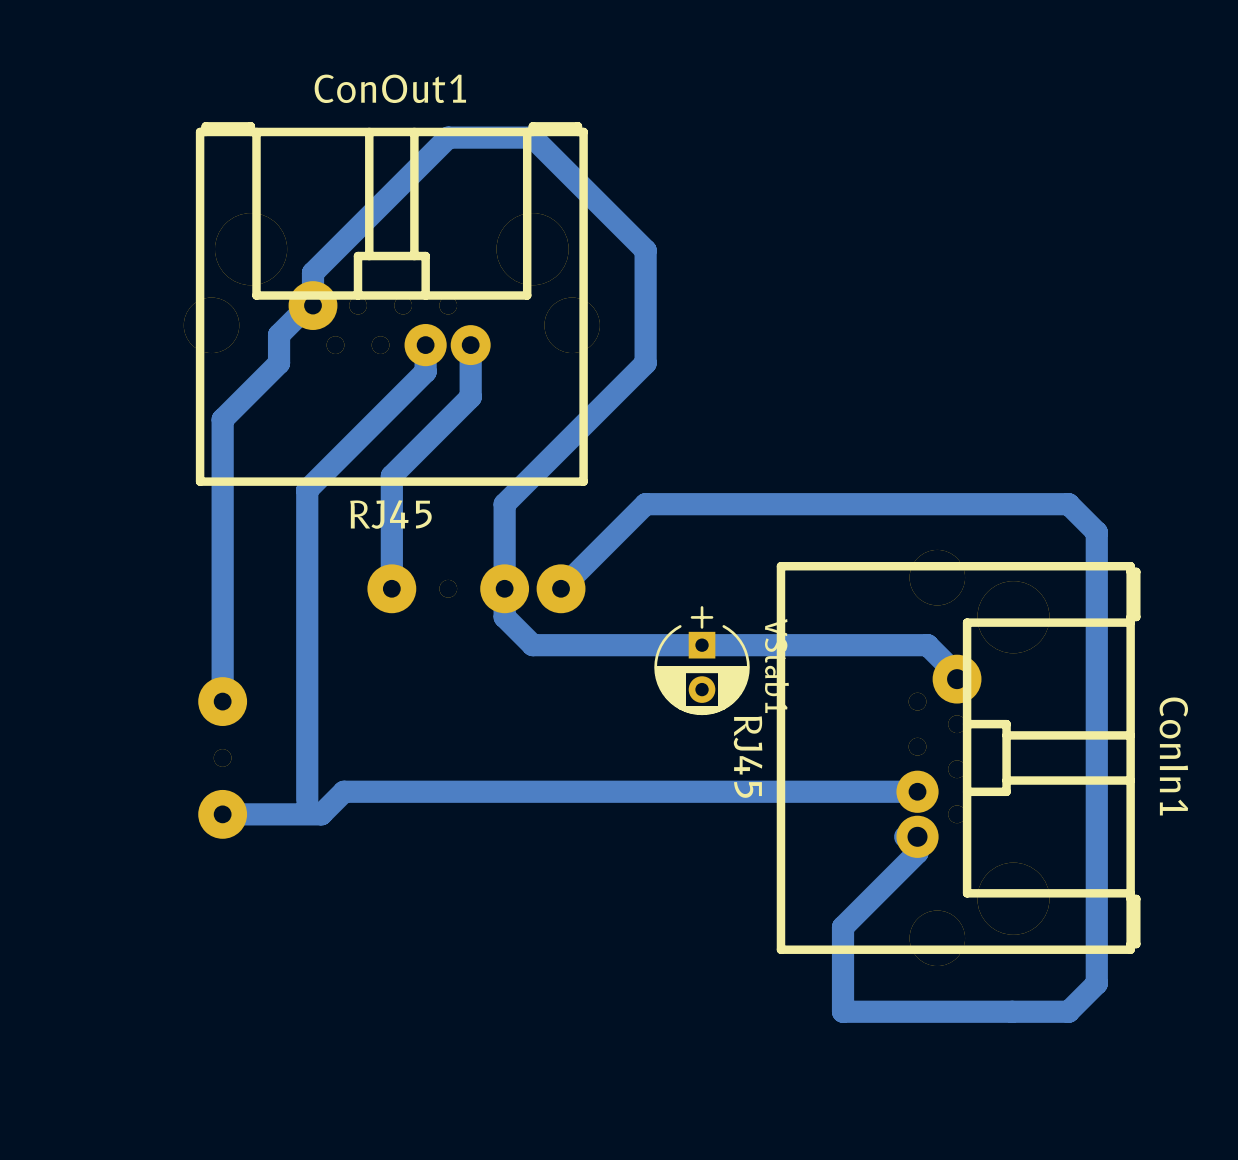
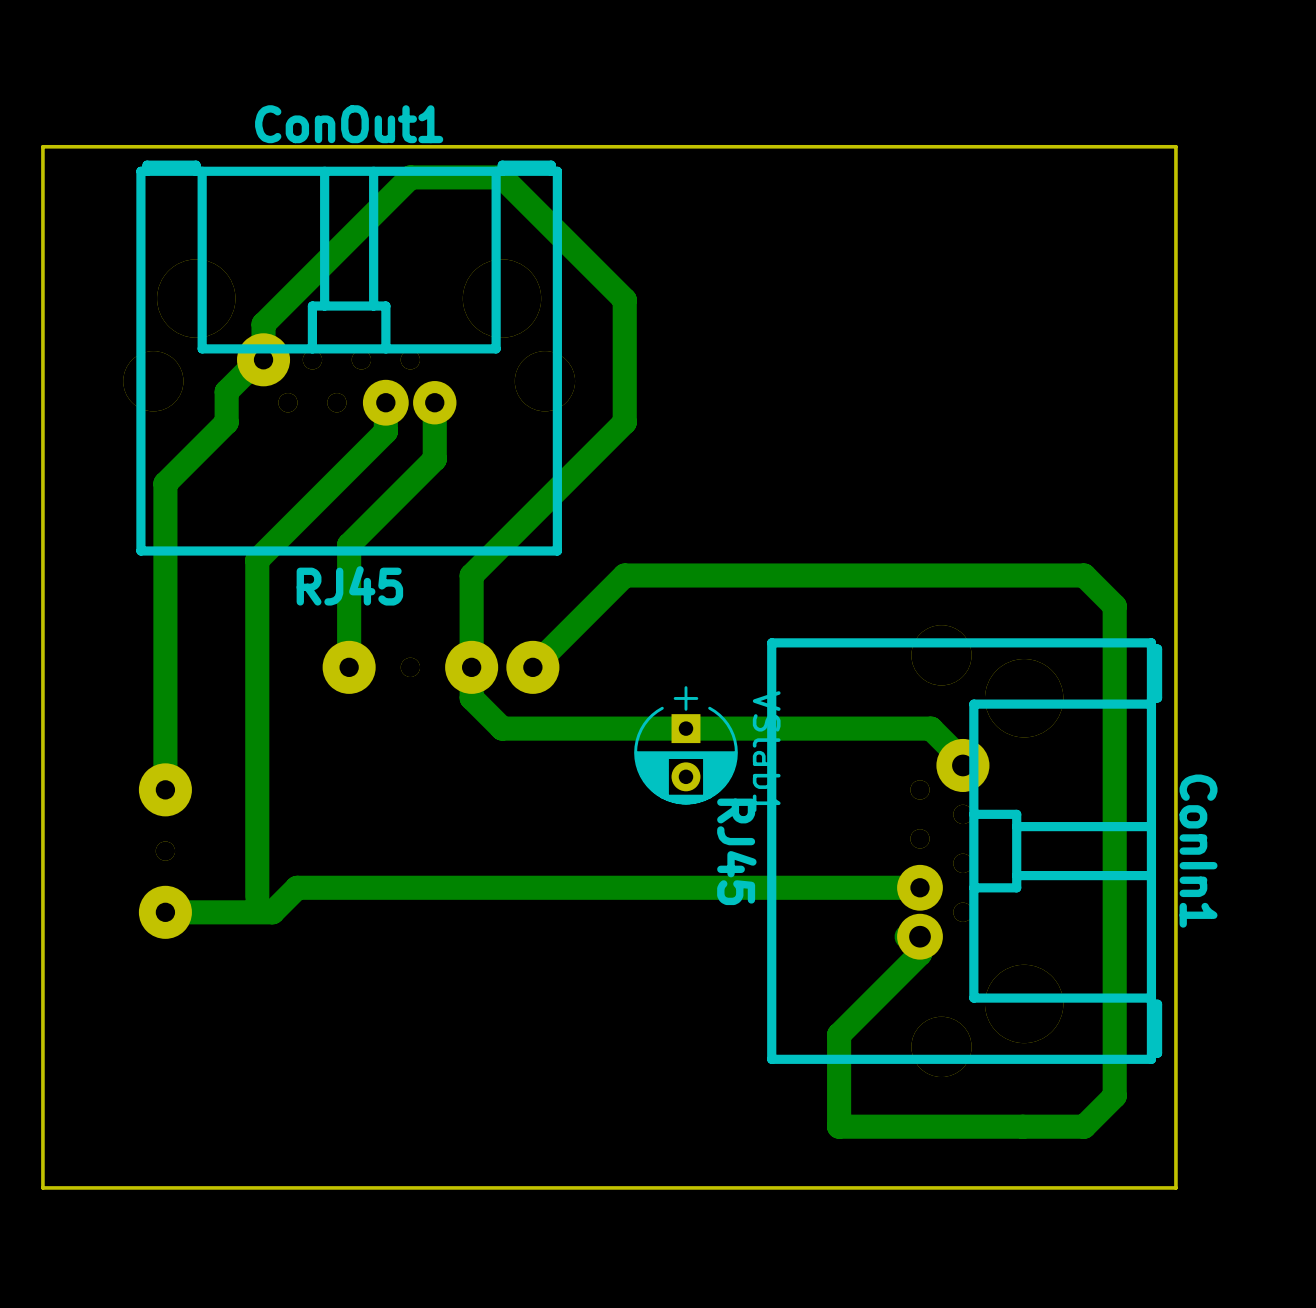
board edge: none -> (1175, 146) (1175, 1187) (42, 1187) (42, 146) (1175, 146)

